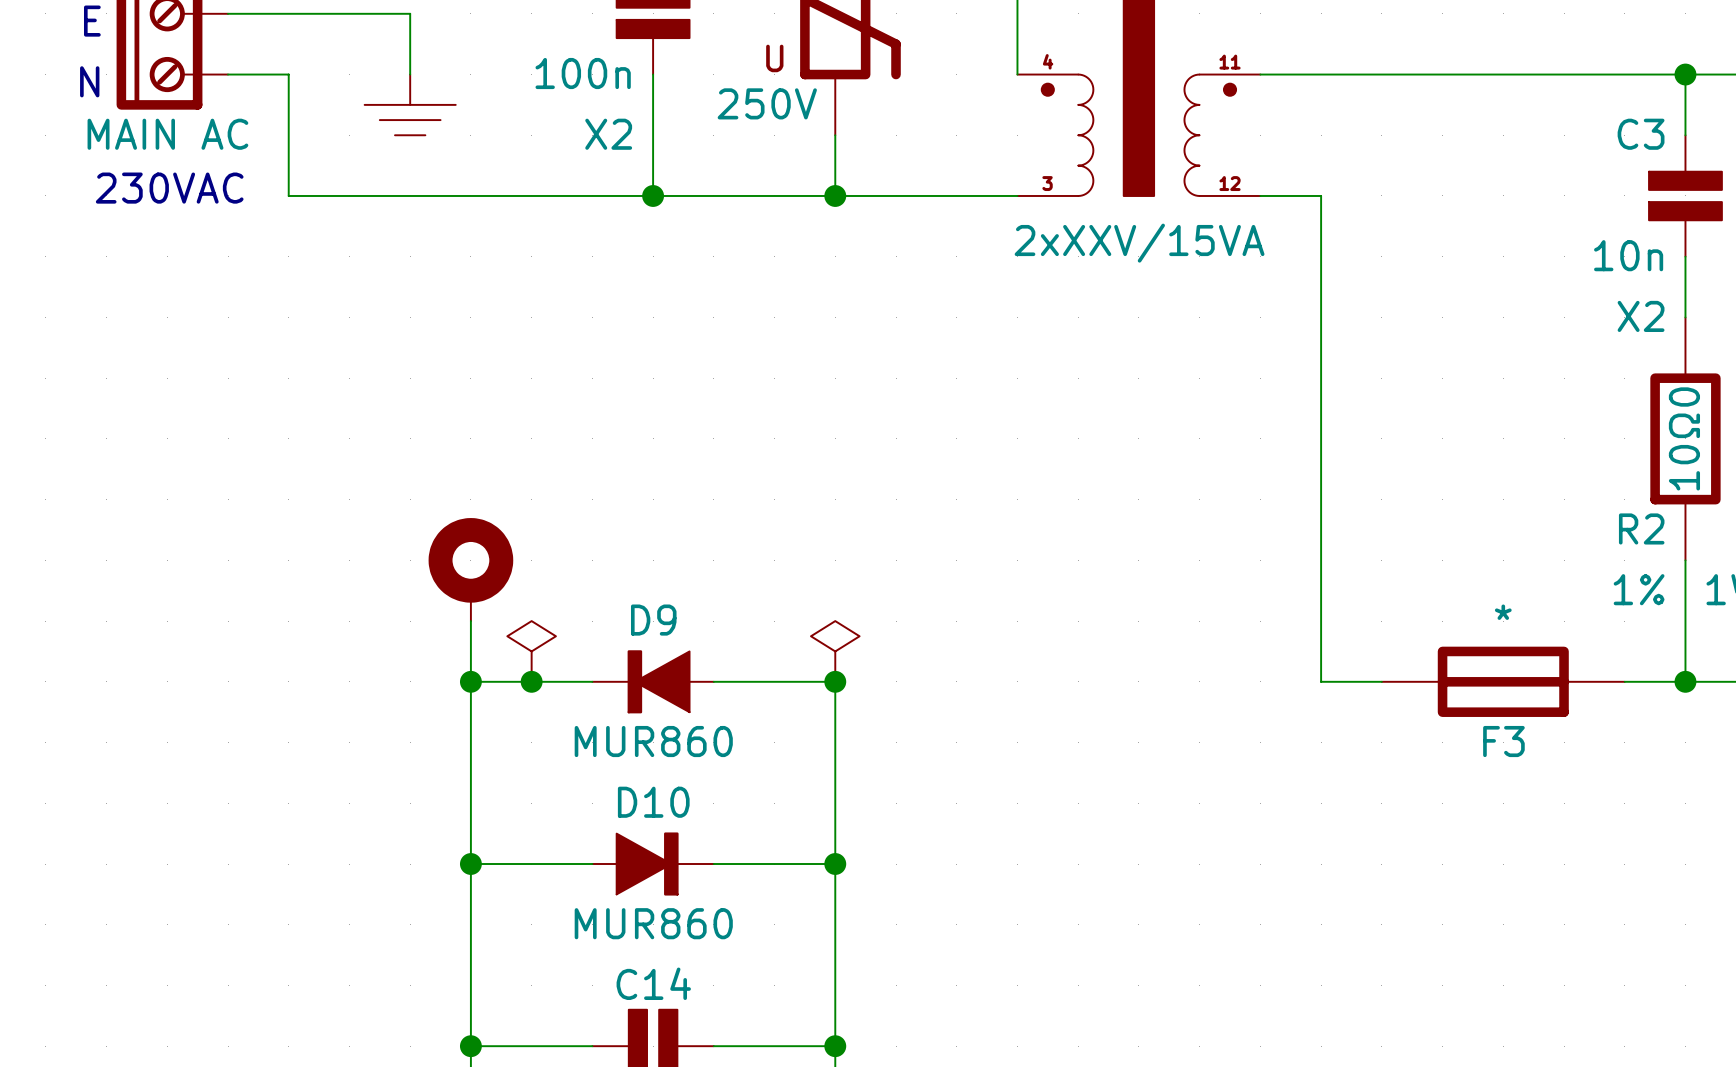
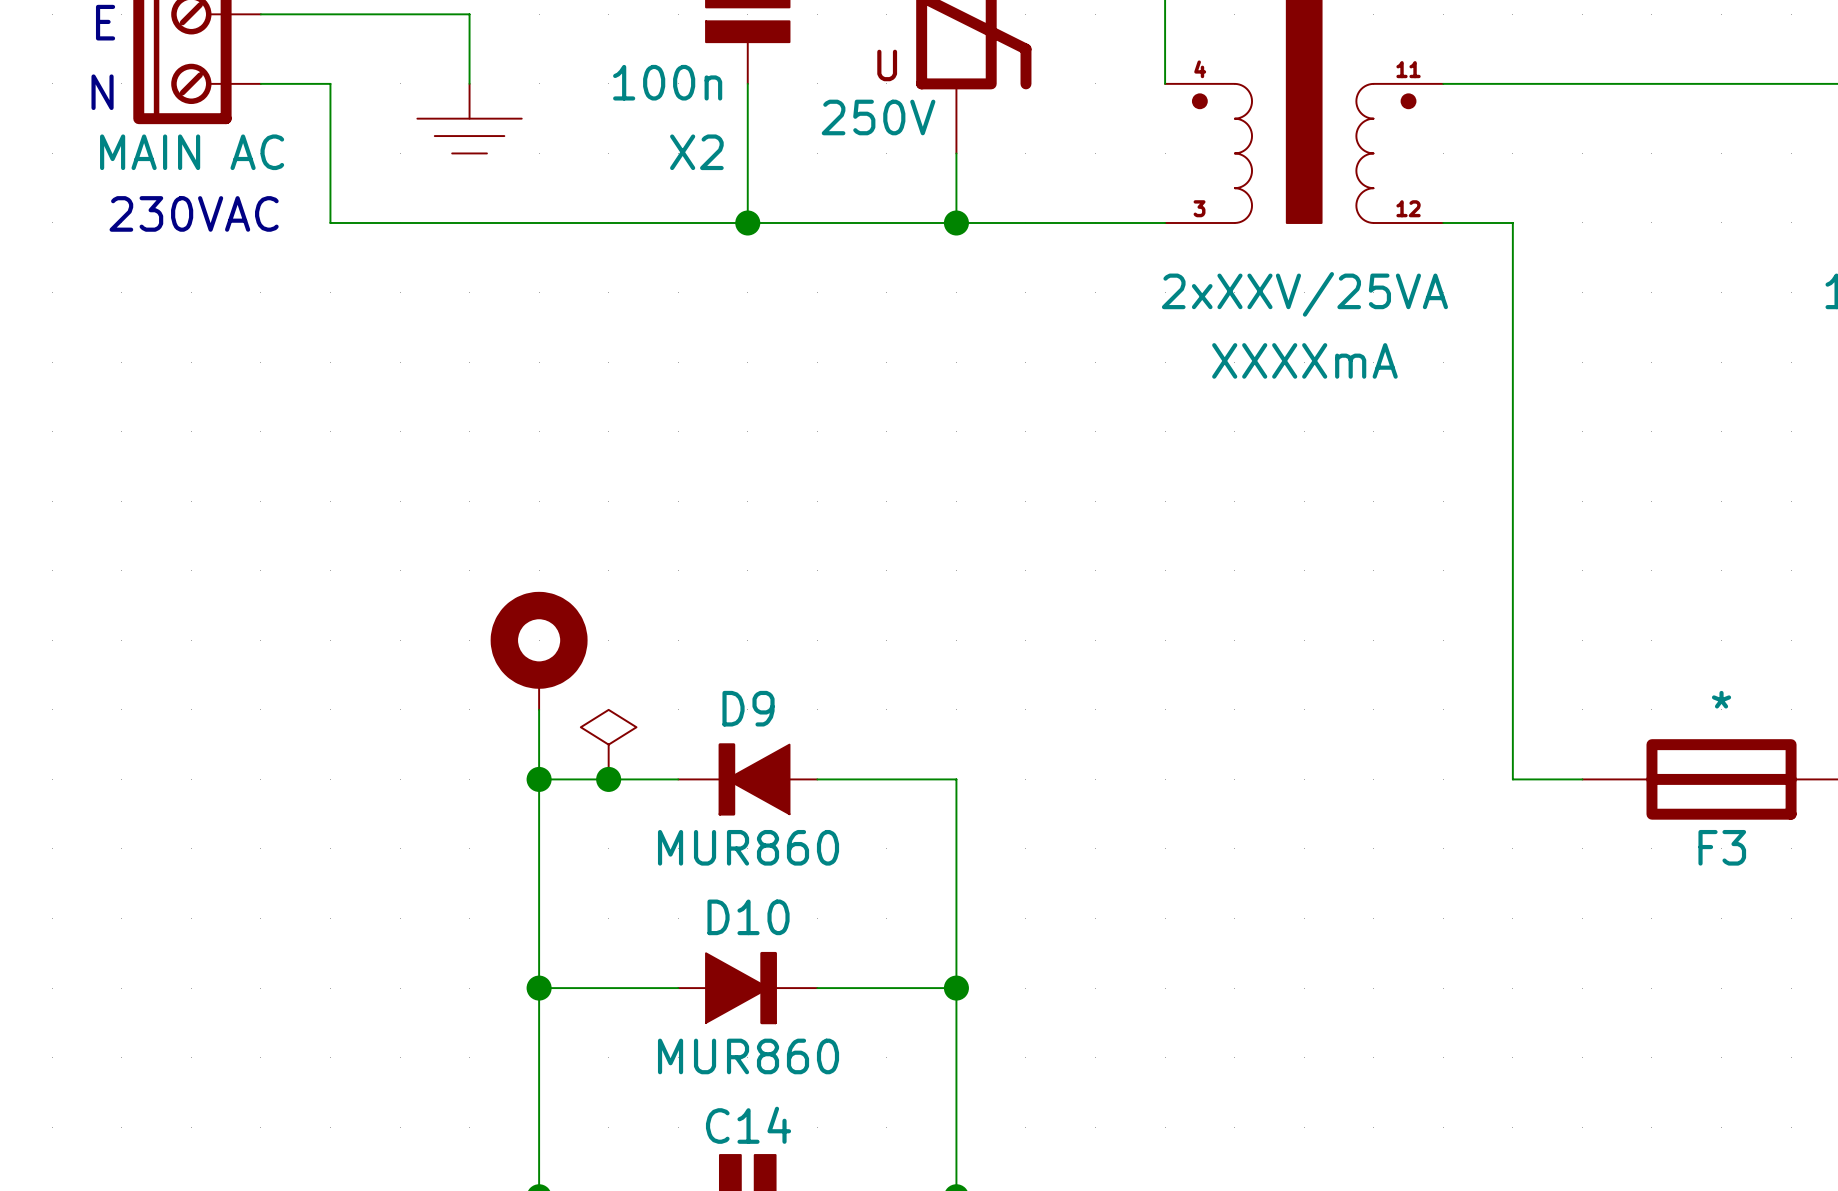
part value: 2xXXV/15VA (1139, 243) -> 2xXXV/25VA (1304, 294)
part text: none -> XXXXmA (1304, 360)
power symbol: (835, 651) -> none
junction: (835, 681) -> none

